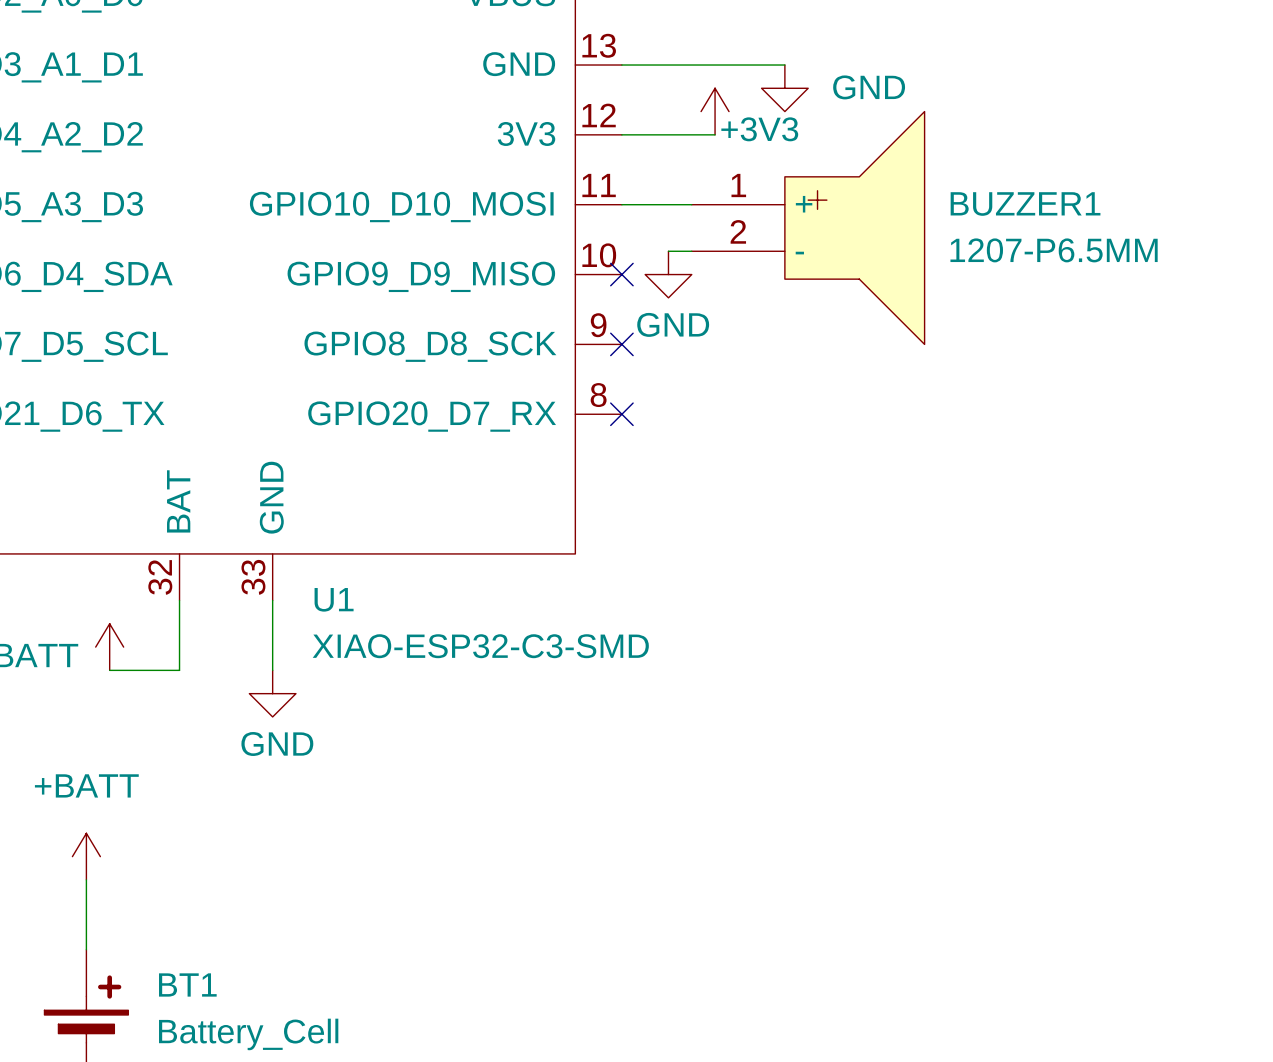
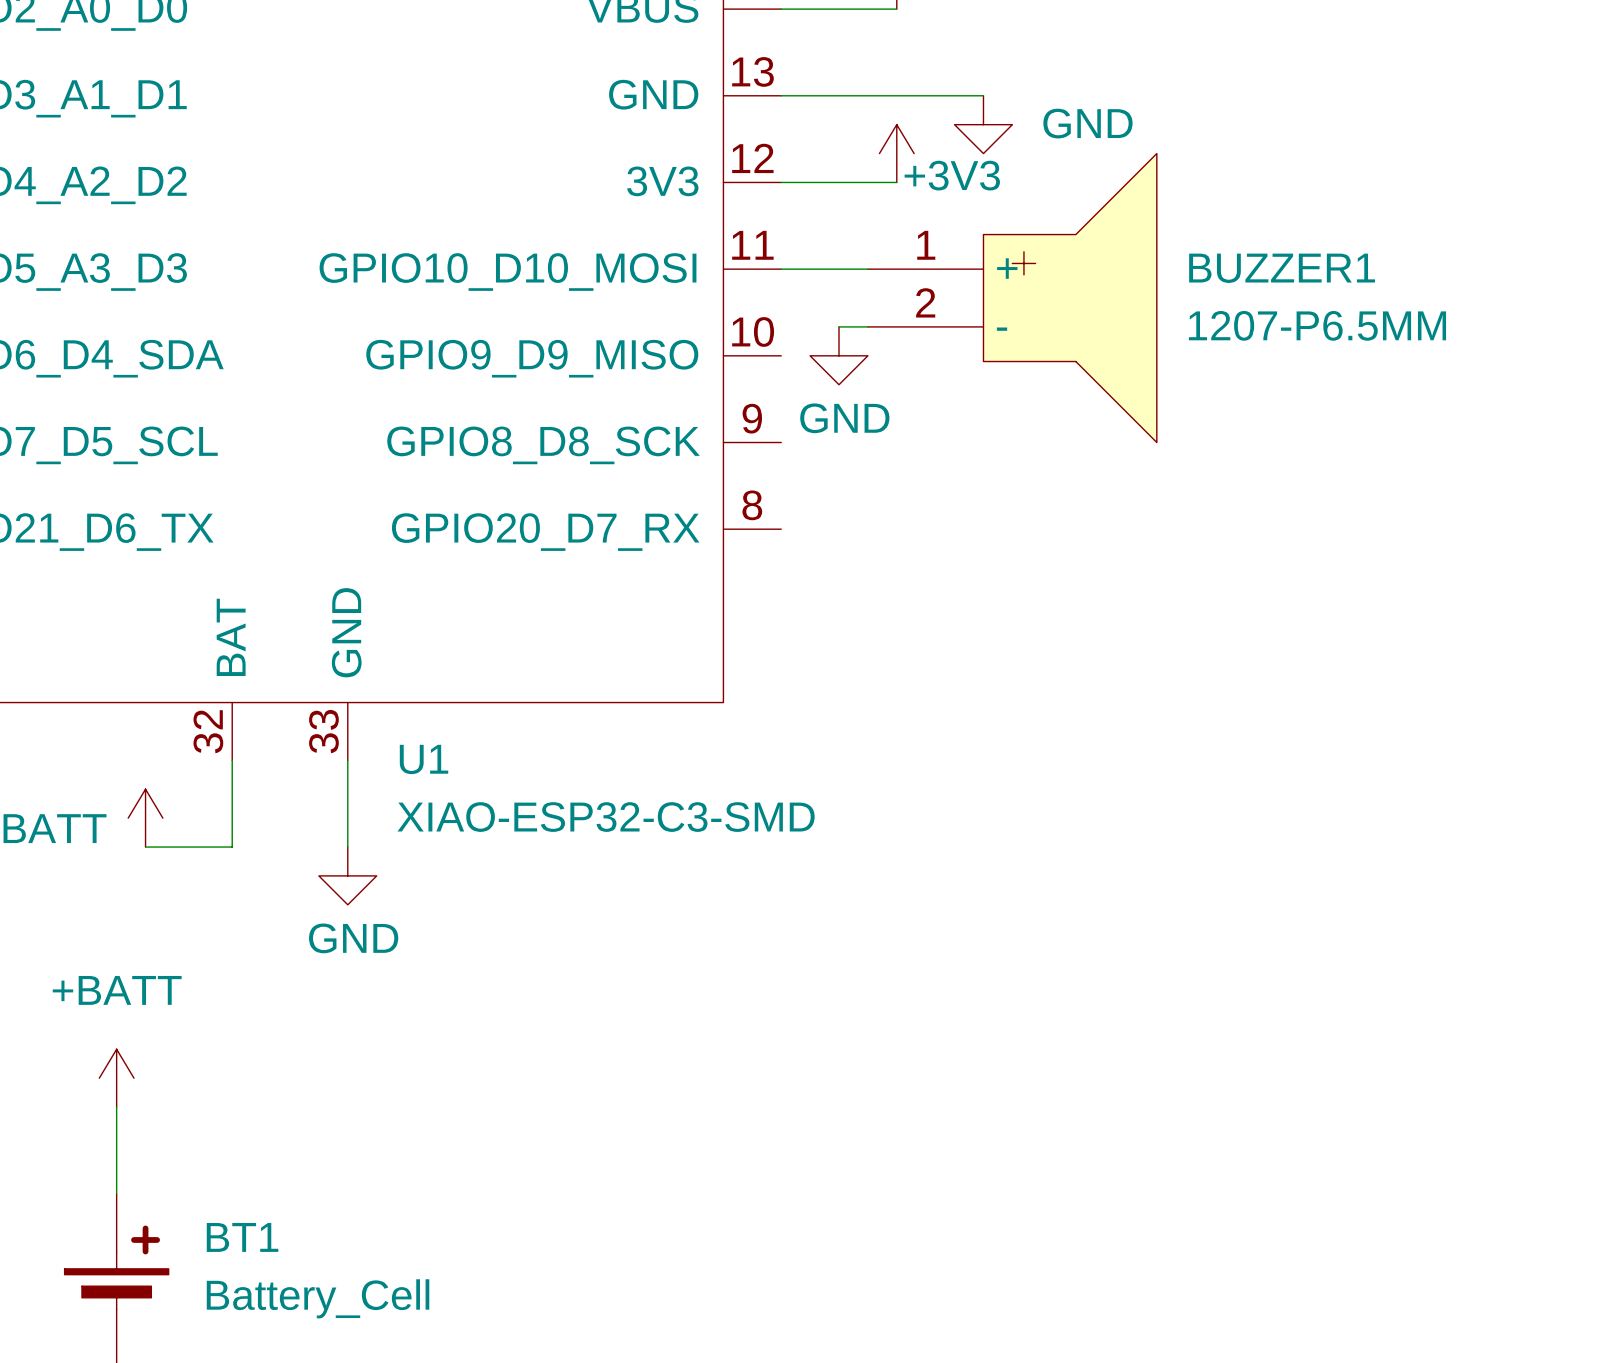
no-connect mark: (621, 274) -> none
no-connect mark: (621, 344) -> none
no-connect mark: (621, 414) -> none

